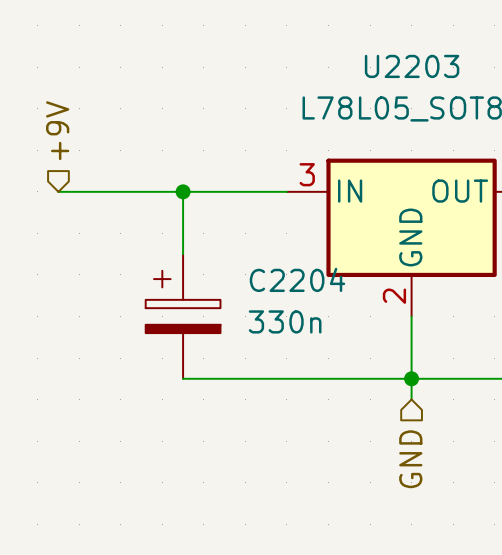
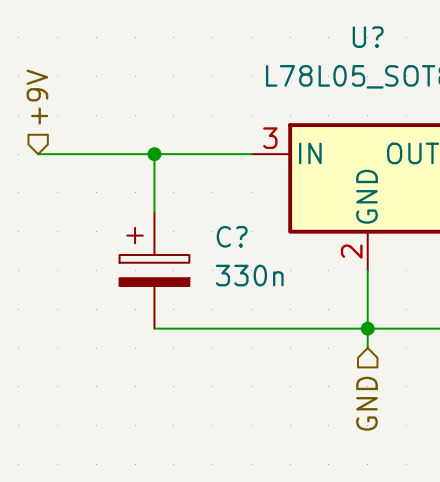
U2203 name: U2203 (412, 66) -> U? (368, 37)
C2204 name: C2204 (297, 279) -> C? (232, 236)

